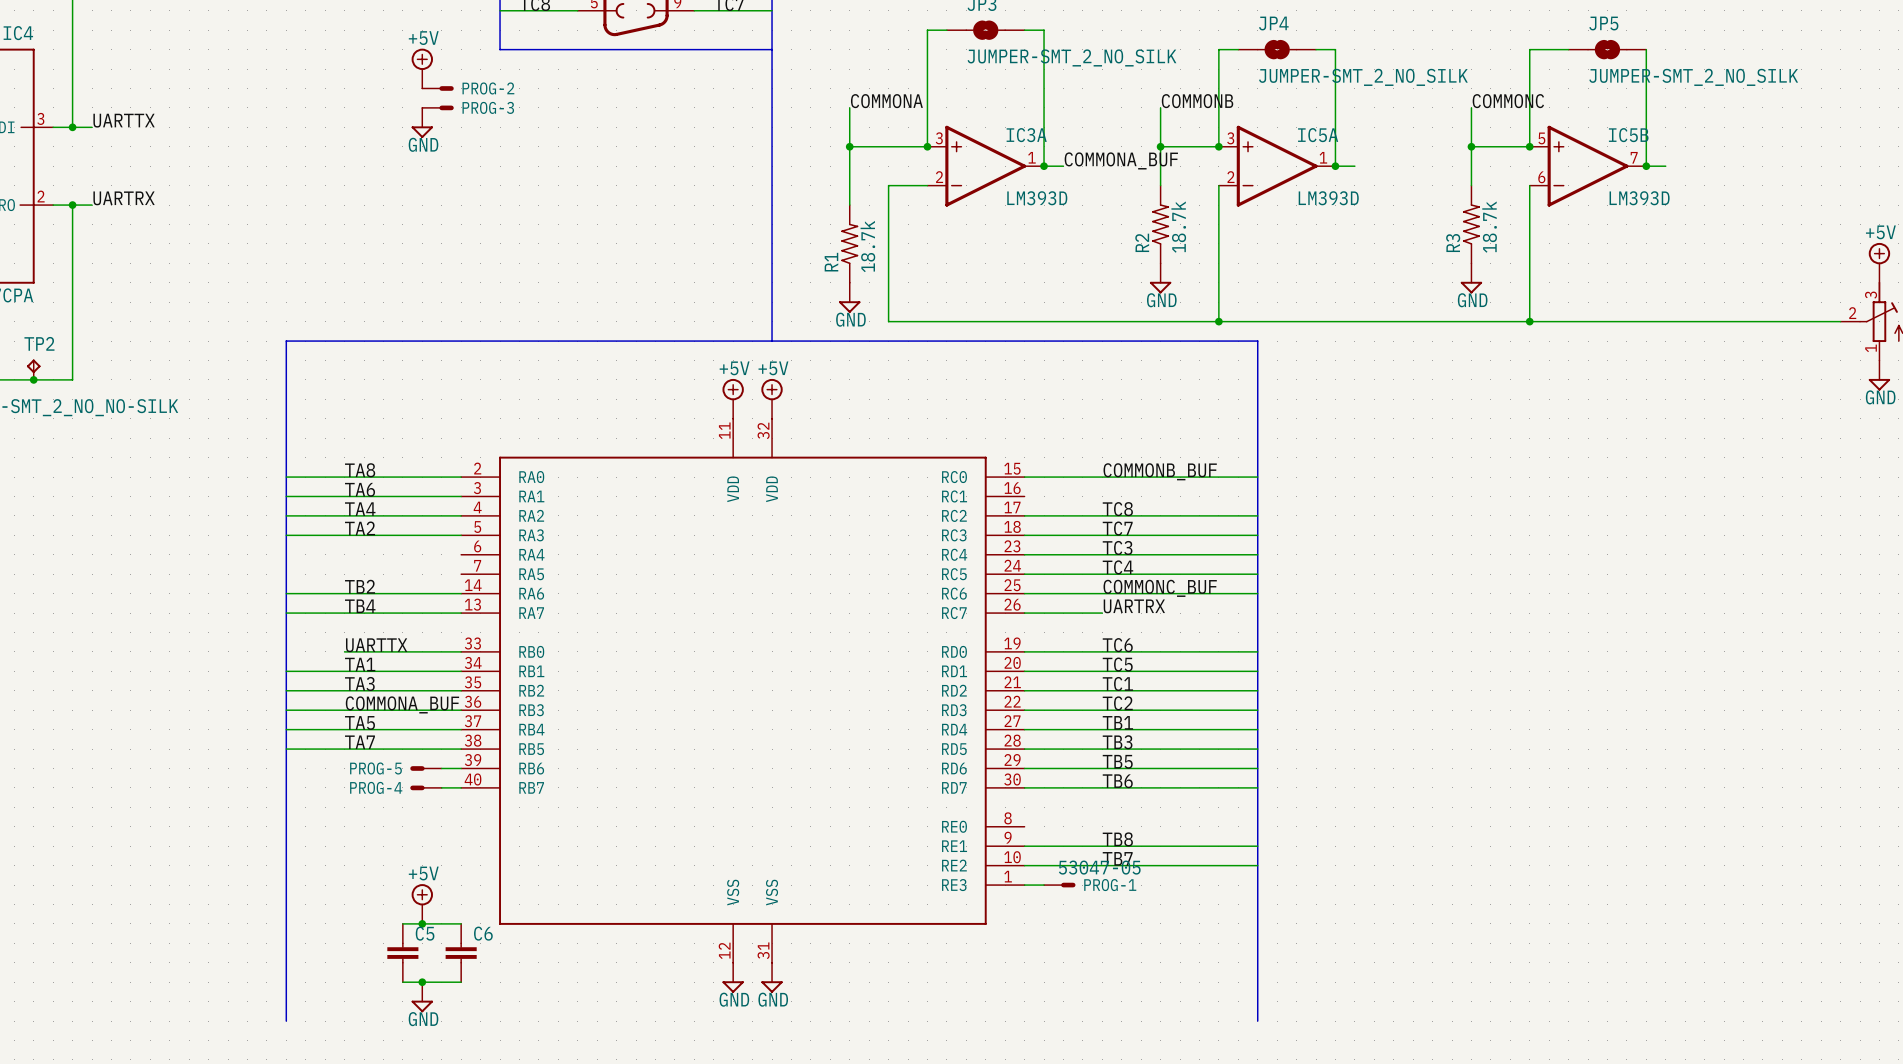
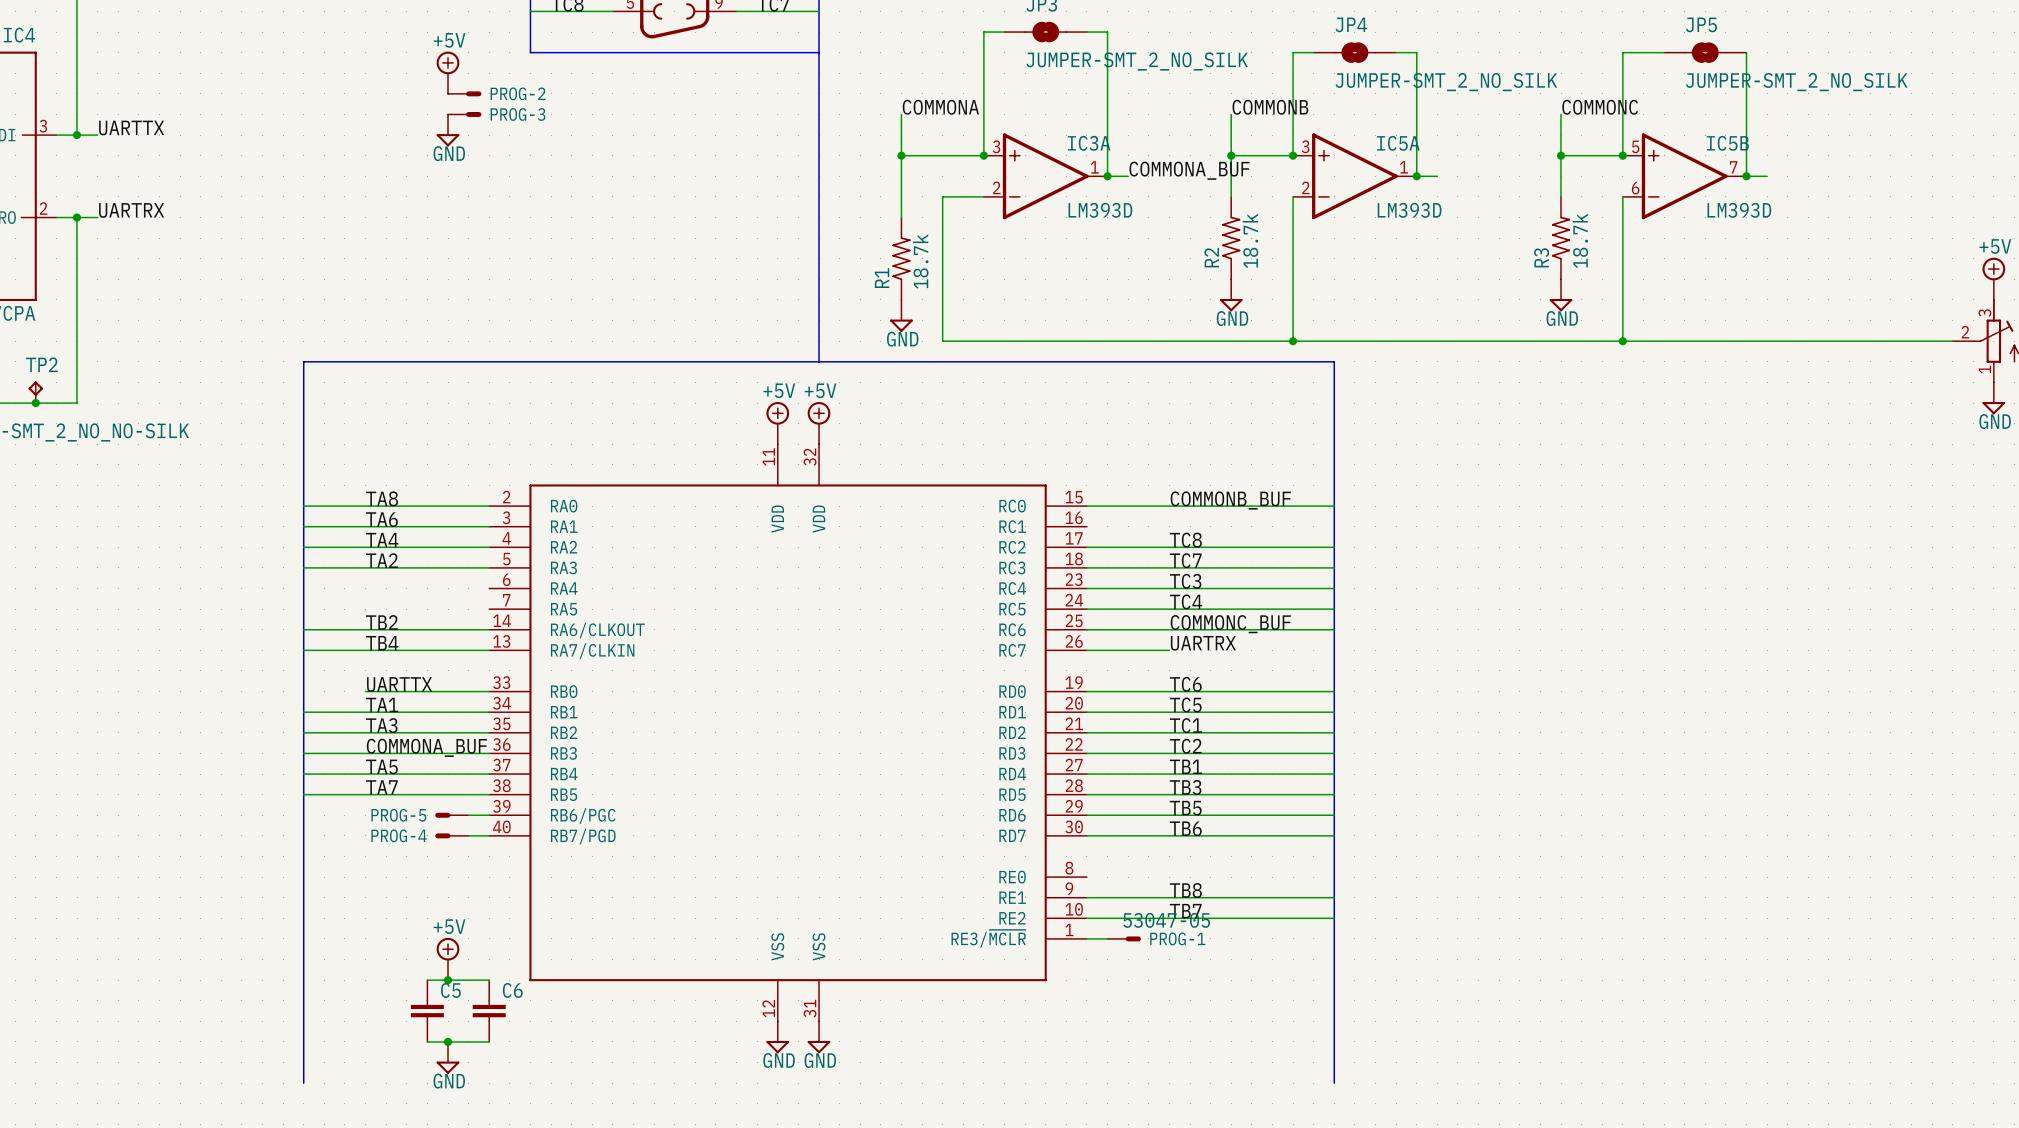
part pin name: RA6 (531, 593) -> RA6/CLKOUT (597, 630)
part pin name: RA7 (531, 613) -> RA7/CLKIN (592, 651)
part pin name: RB6 (531, 768) -> RB6/PGC (583, 815)
part pin name: RB7 (531, 787) -> RB7/PGD (583, 836)
part pin name: RE3 (954, 885) -> RE3/~{MCLR} (988, 938)

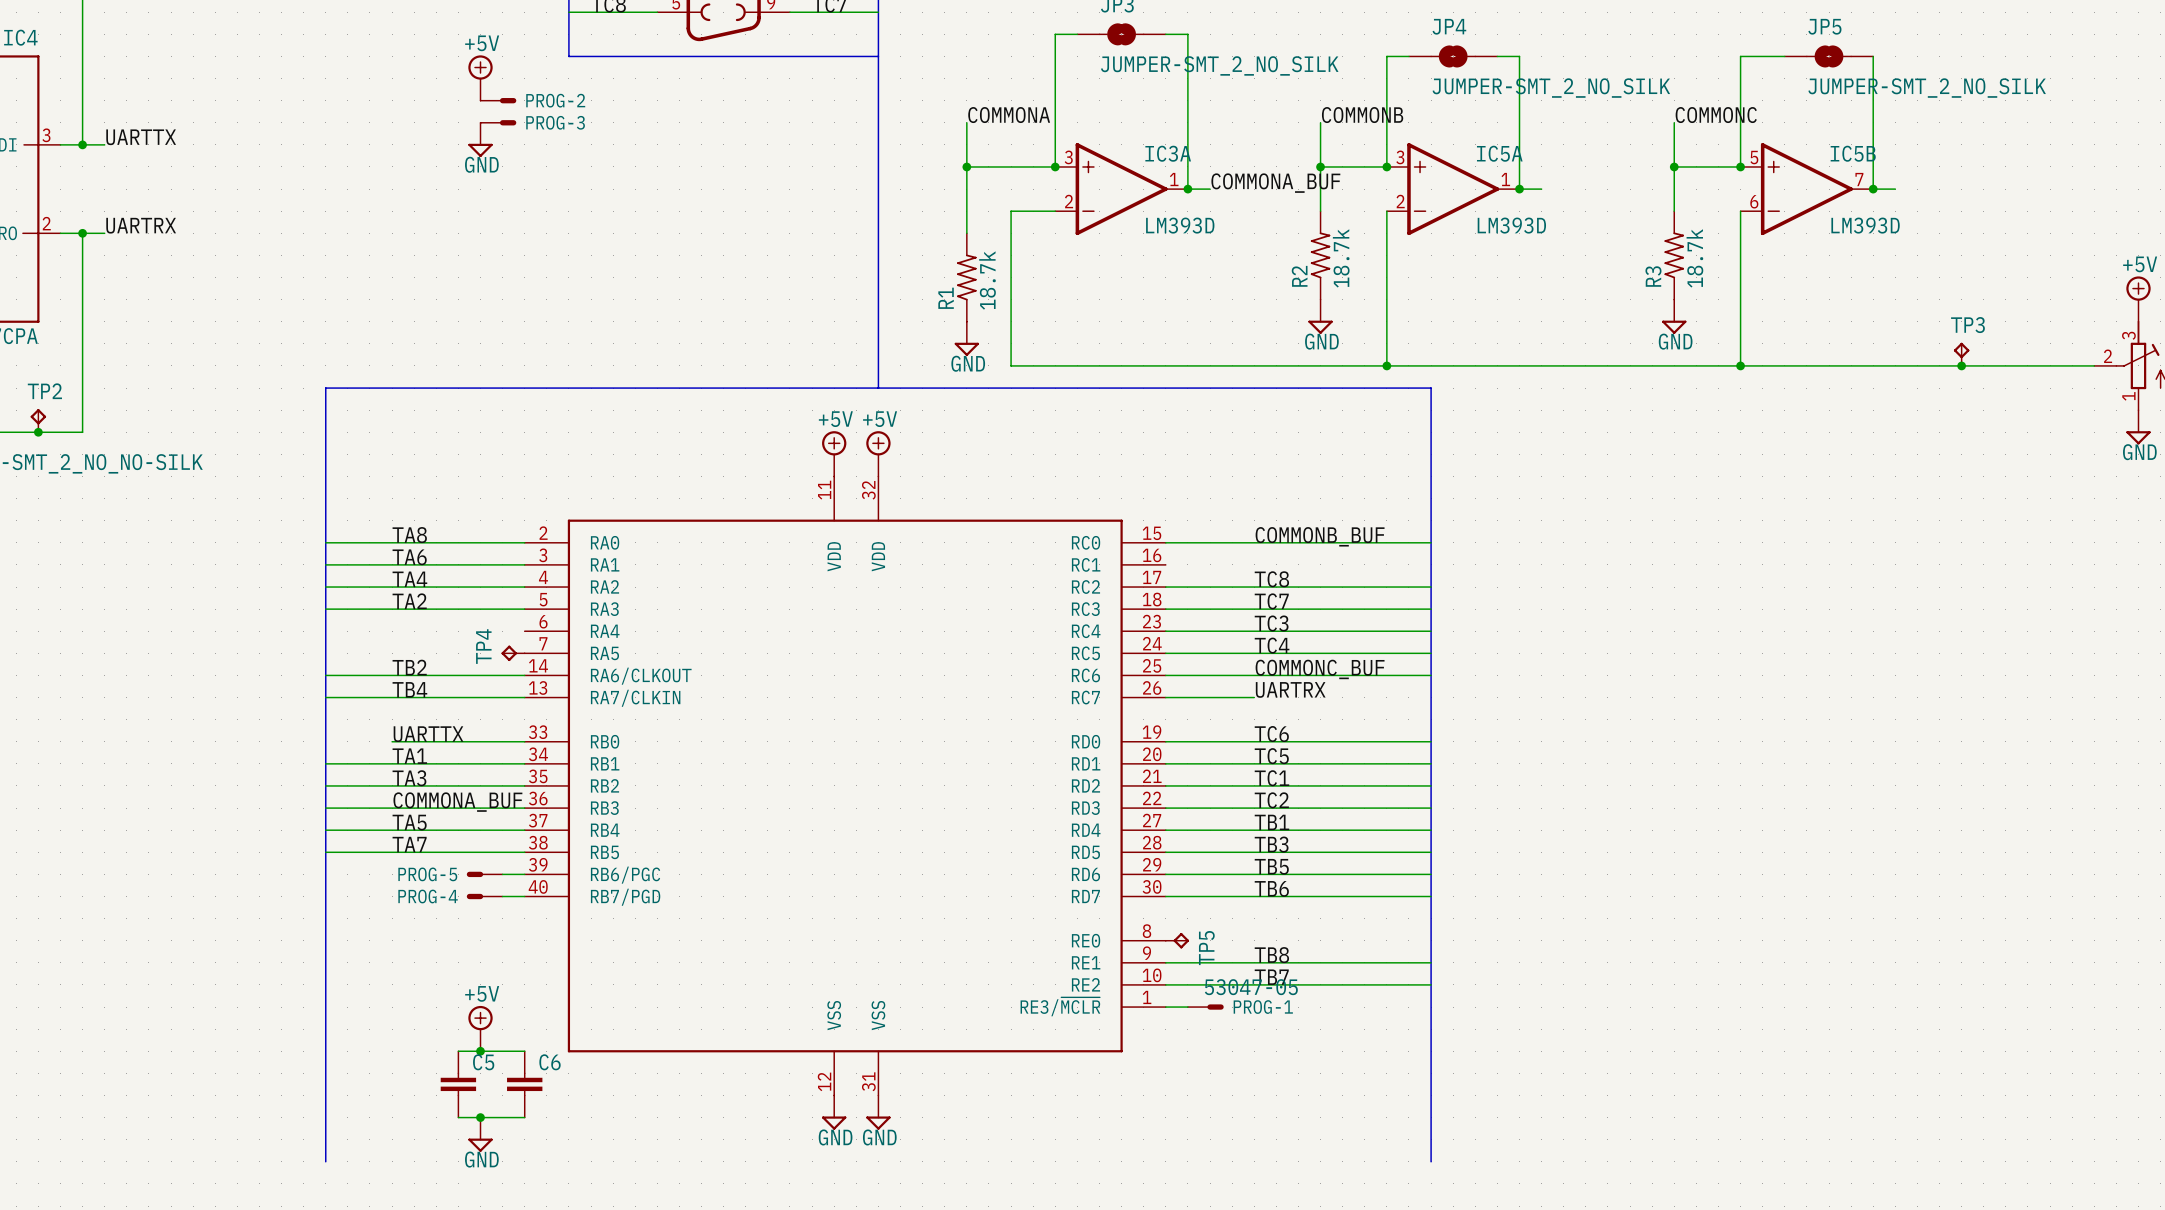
TP3: none -> (1961, 354)
junction: none -> (1961, 365)
TP4: none -> (513, 653)
TP5: none -> (1177, 940)

